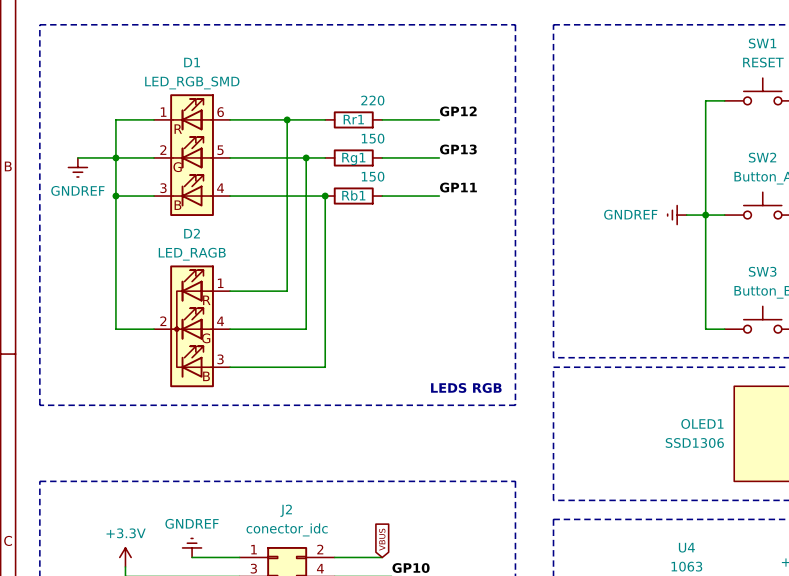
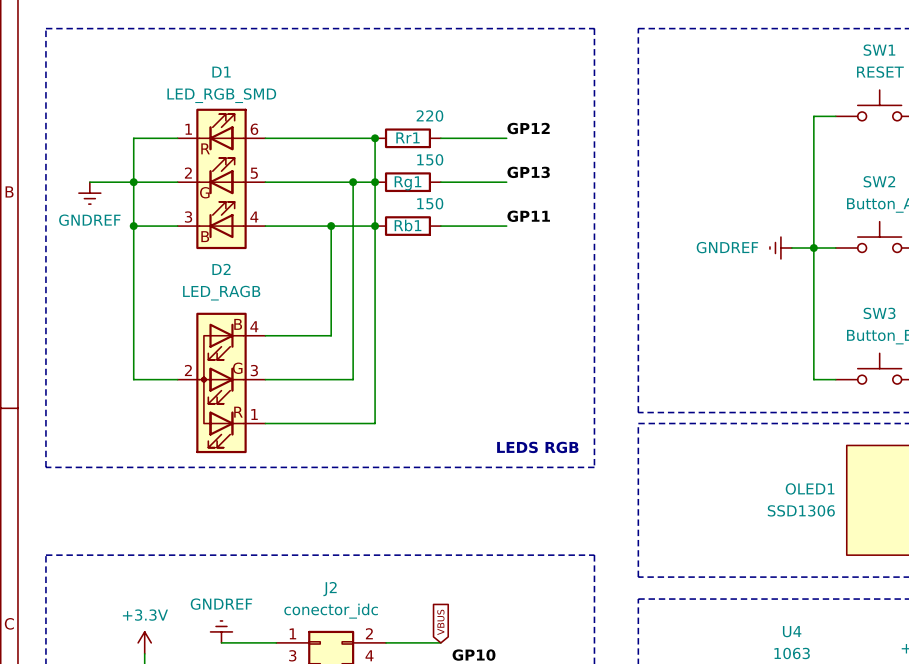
wire: (287, 119) (287, 196) -> (375, 138) (375, 226)
junction: (287, 119) -> none
junction: none -> (375, 138)
junction: none -> (375, 182)
junction: none -> (331, 226)
D2 symbol: [154, 265, 231, 388] -> [177, 312, 266, 454]

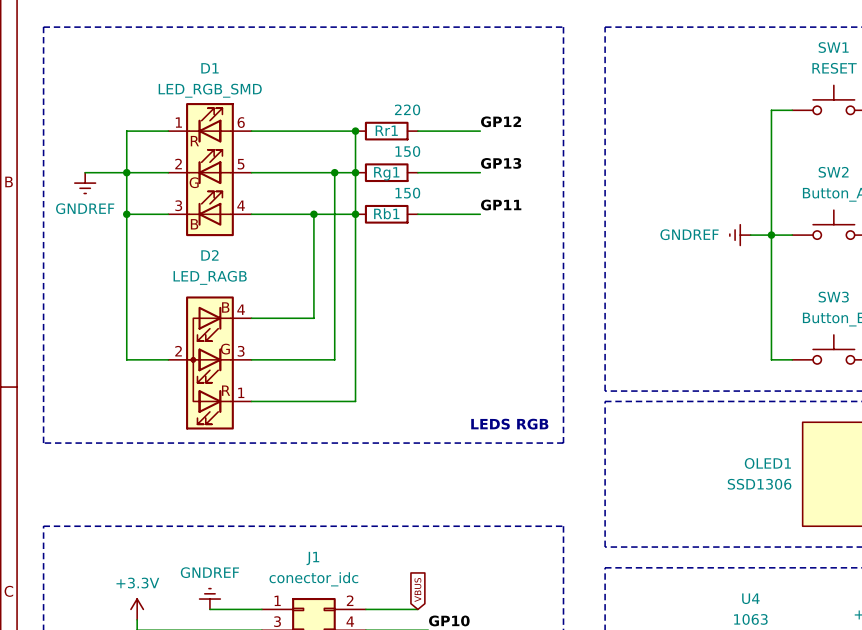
J2 name: J2 (330, 589) -> J1 (312, 558)

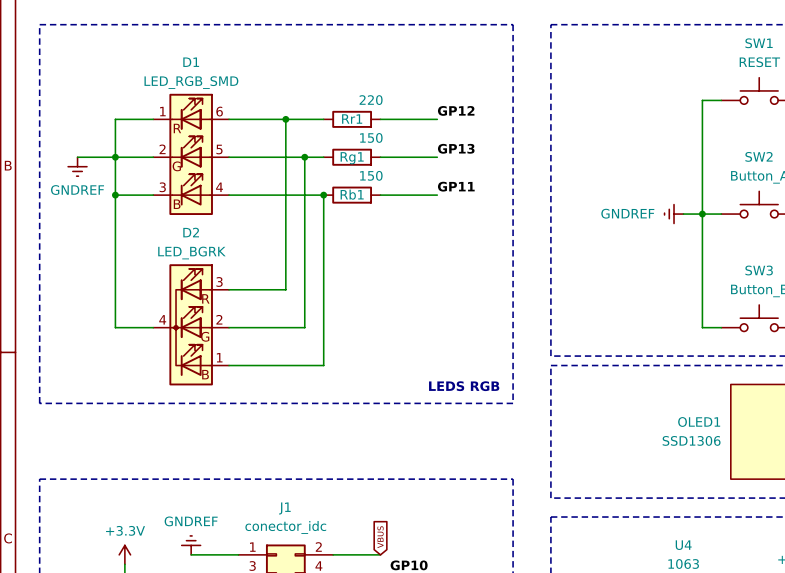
junction: none -> (285, 119)
wire: (355, 131) (355, 214) -> (285, 119) (285, 195)
junction: (355, 131) -> none
junction: (355, 172) -> none
junction: (313, 214) -> none
D2 value: LED_RAGB (210, 277) -> LED_BGRK (191, 253)
D2 symbol: [168, 296, 252, 430] -> [153, 264, 230, 386]

